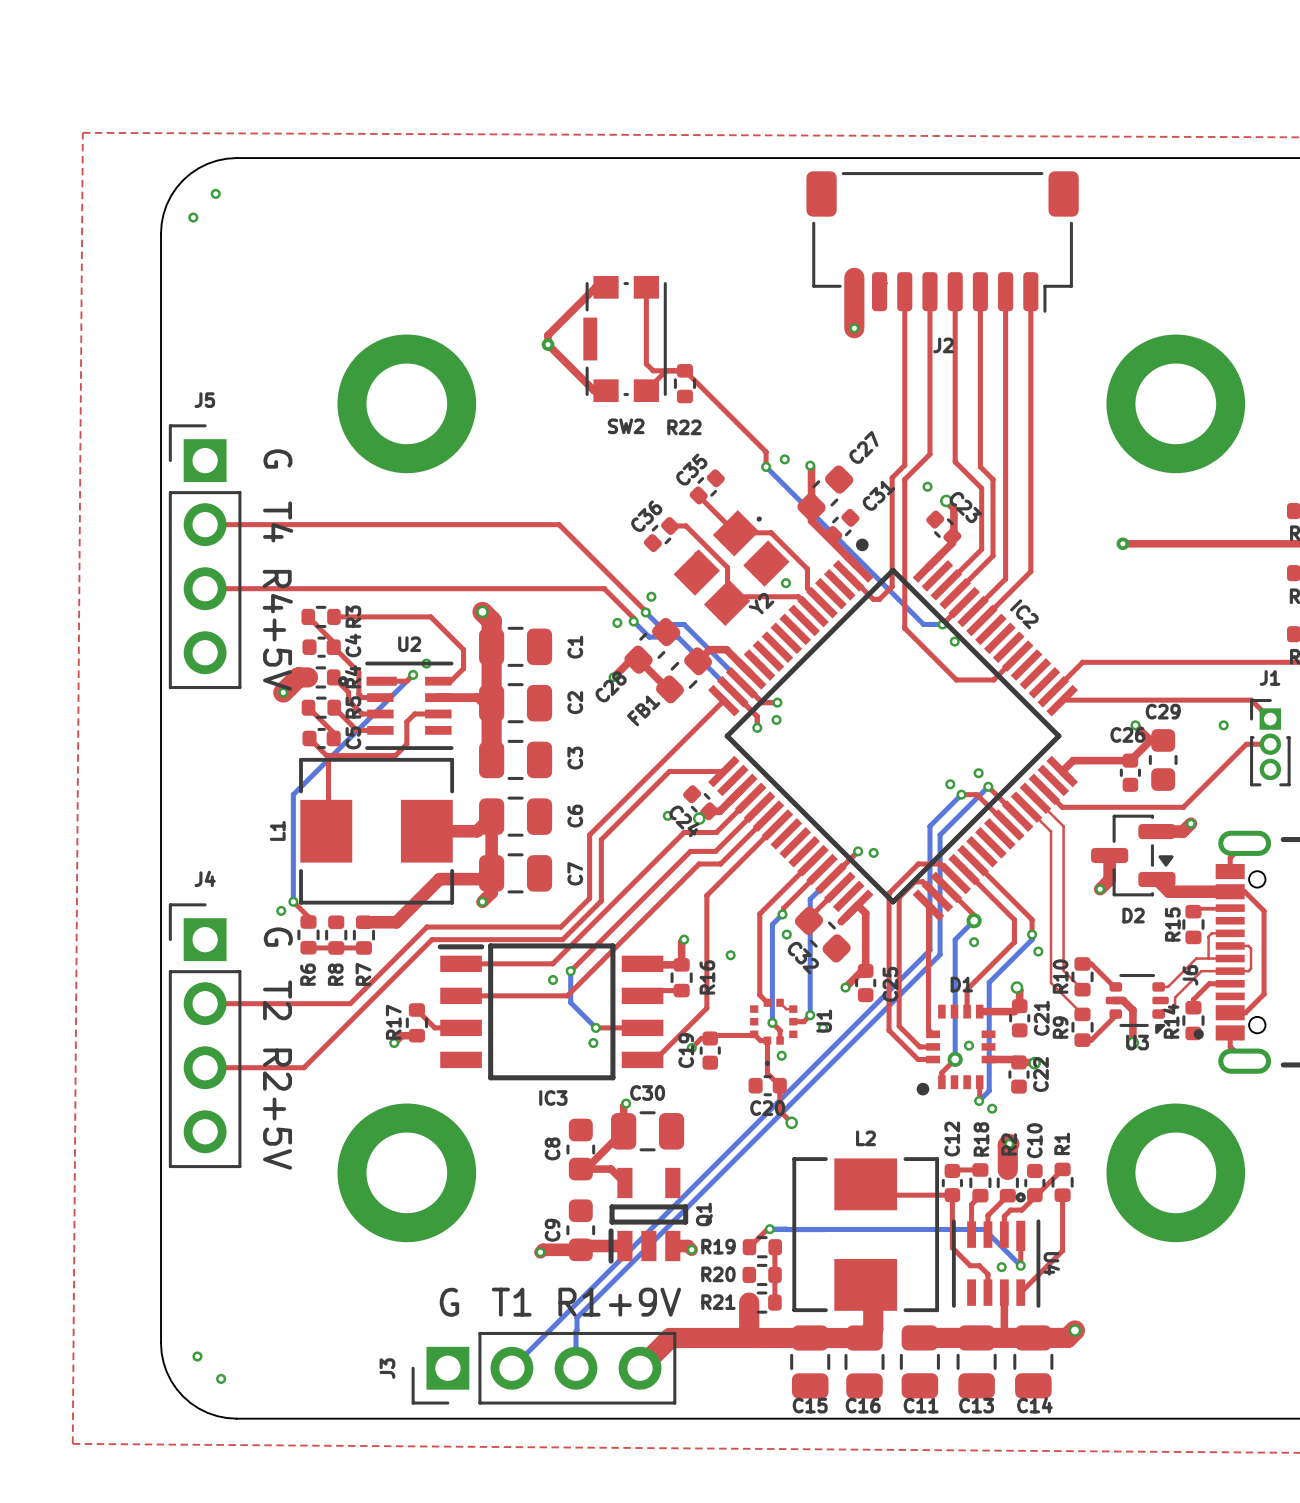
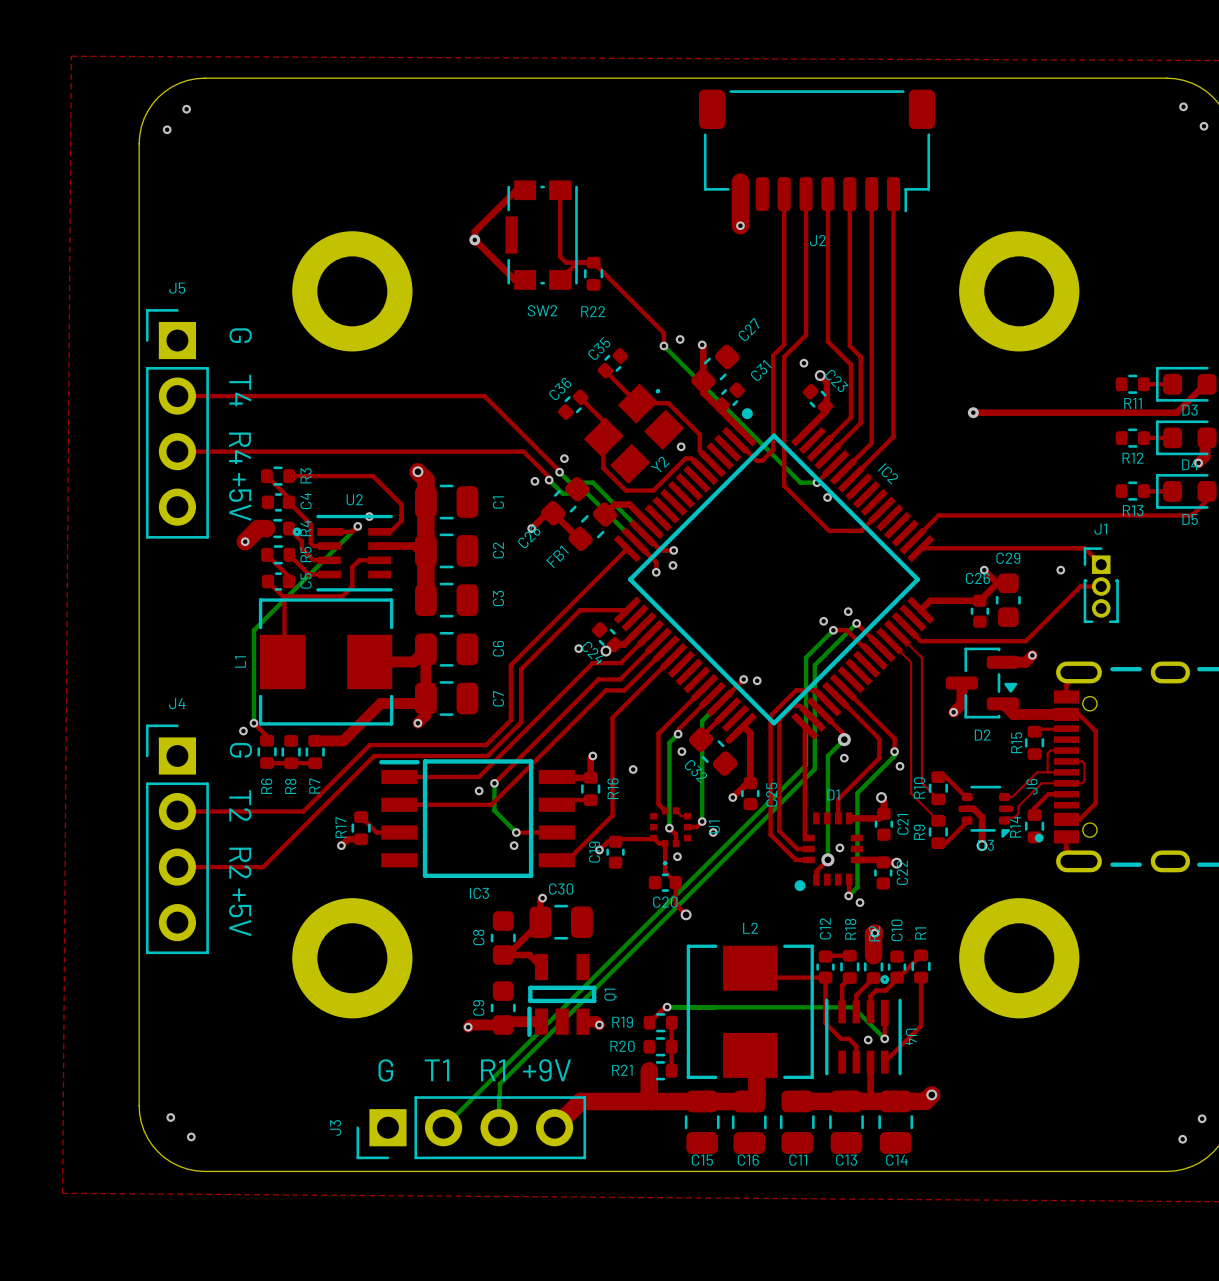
top track: (670, 525) (685, 525) (727, 567) (727, 602) -> none
top track: none -> (580, 398) (603, 421)
top track: (790, 596) (733, 596) (727, 602) -> (685, 458) (653, 490) (625, 490) (603, 468) (603, 437)

